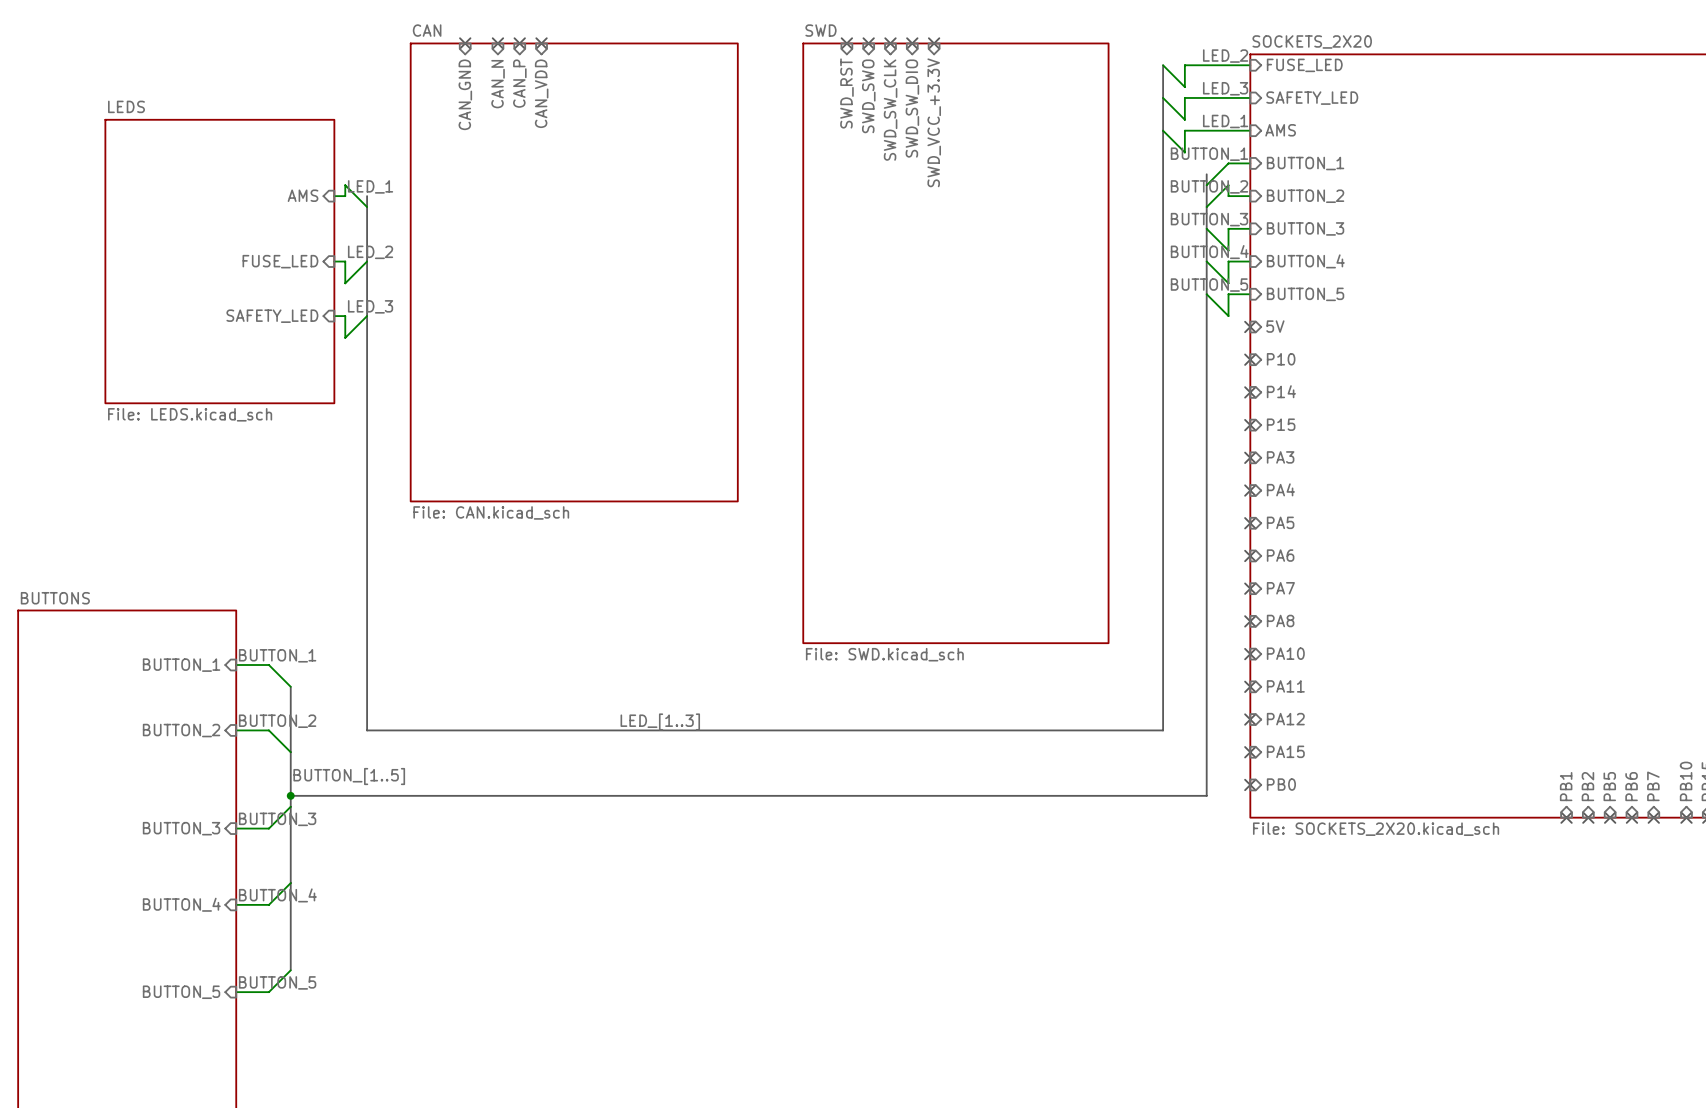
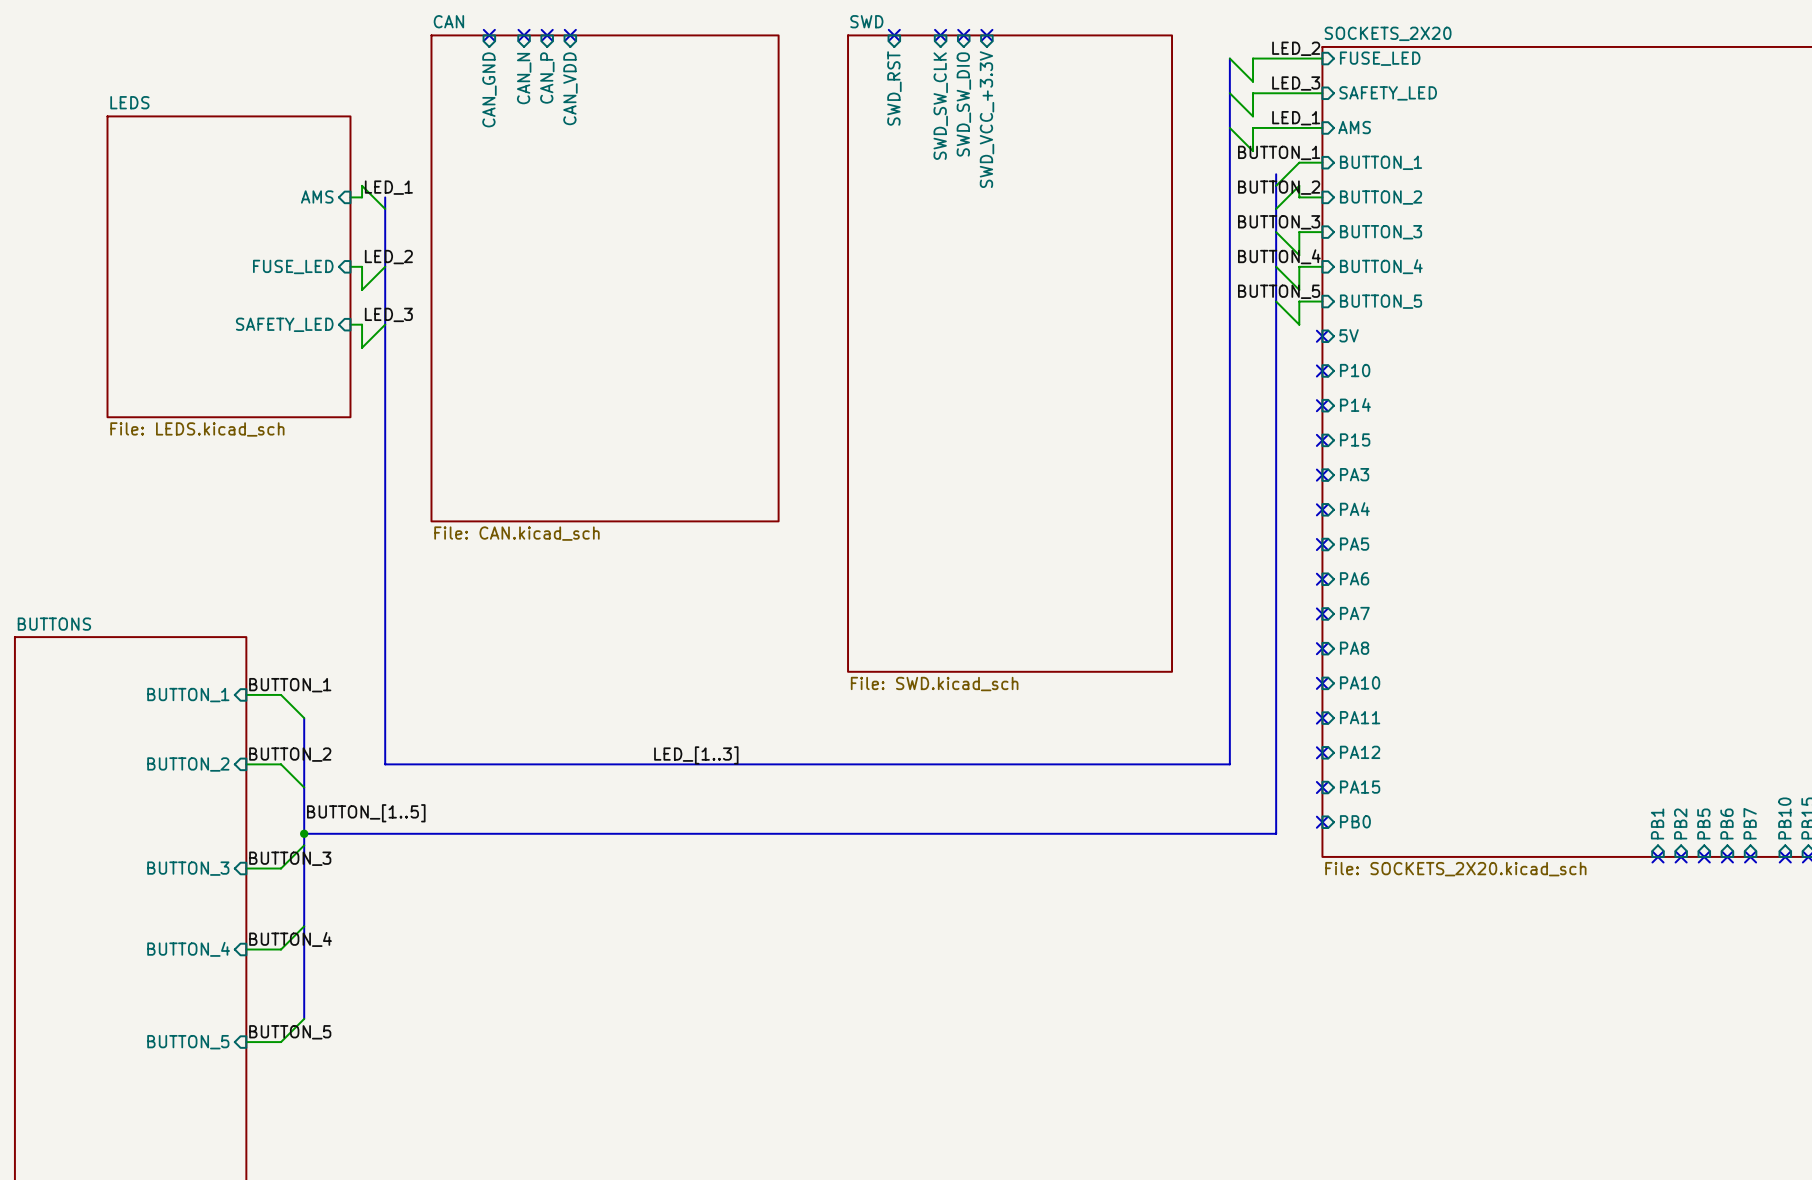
no-connect mark: (868, 43) -> none
sheet pin: SWD_SWO (868, 96) -> none

